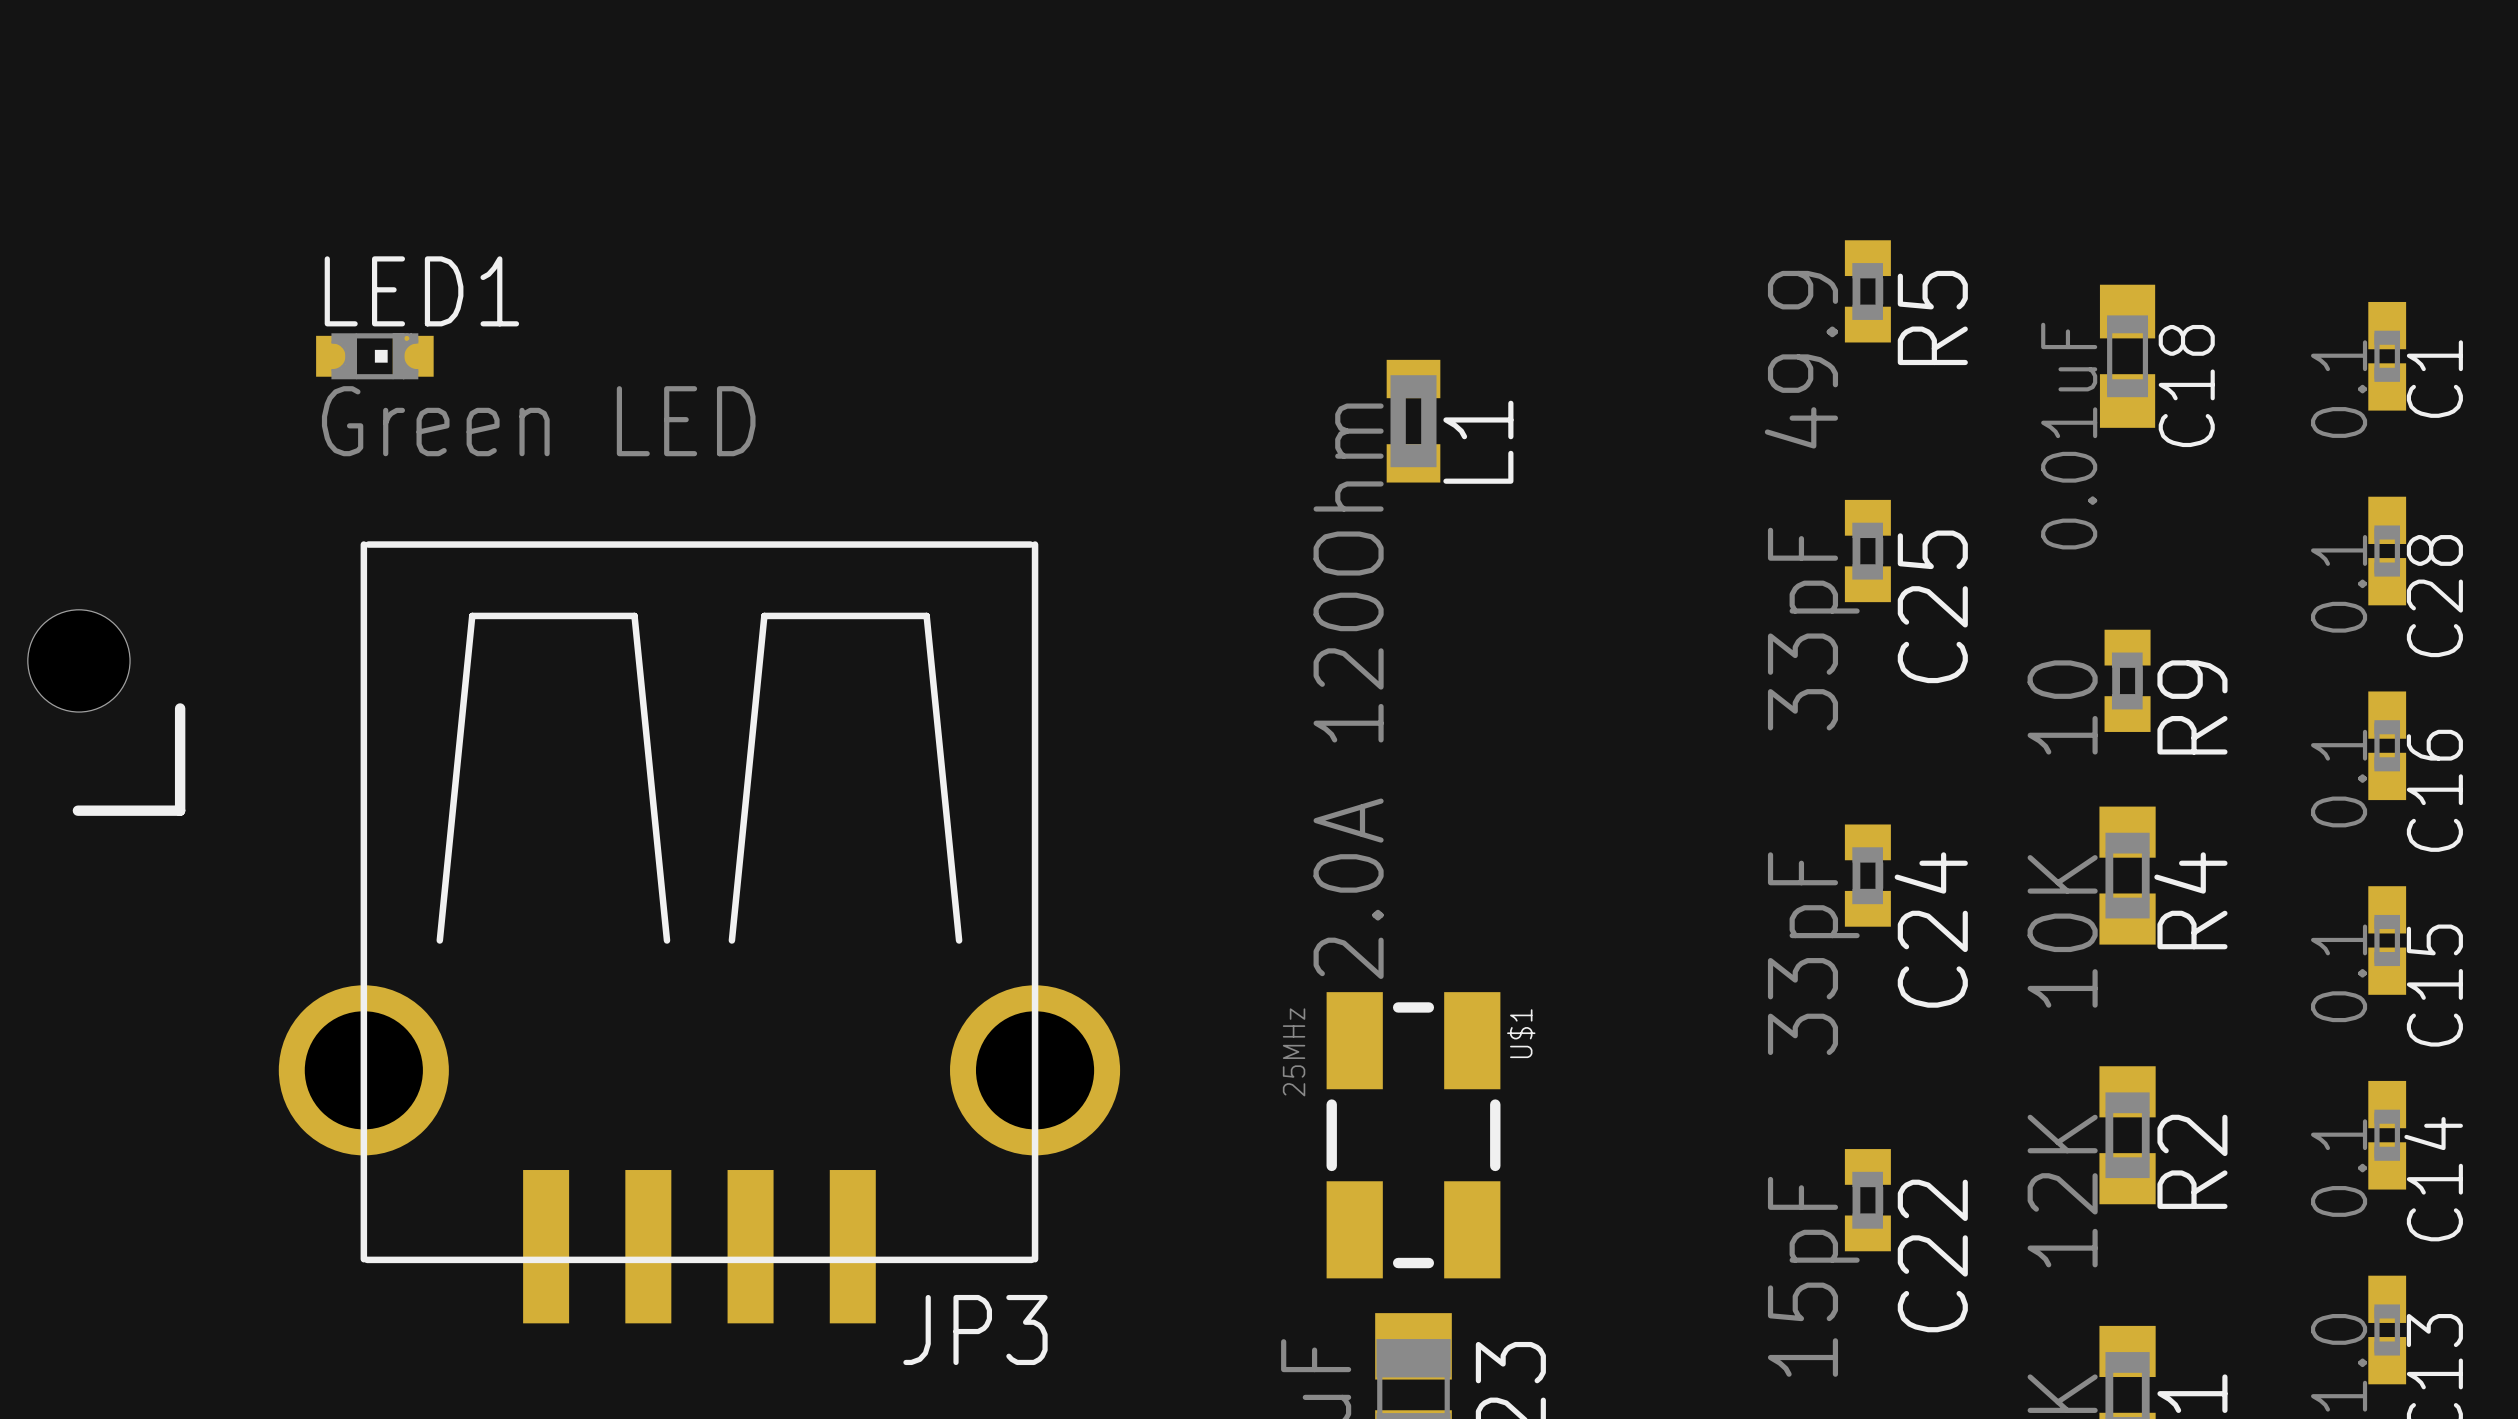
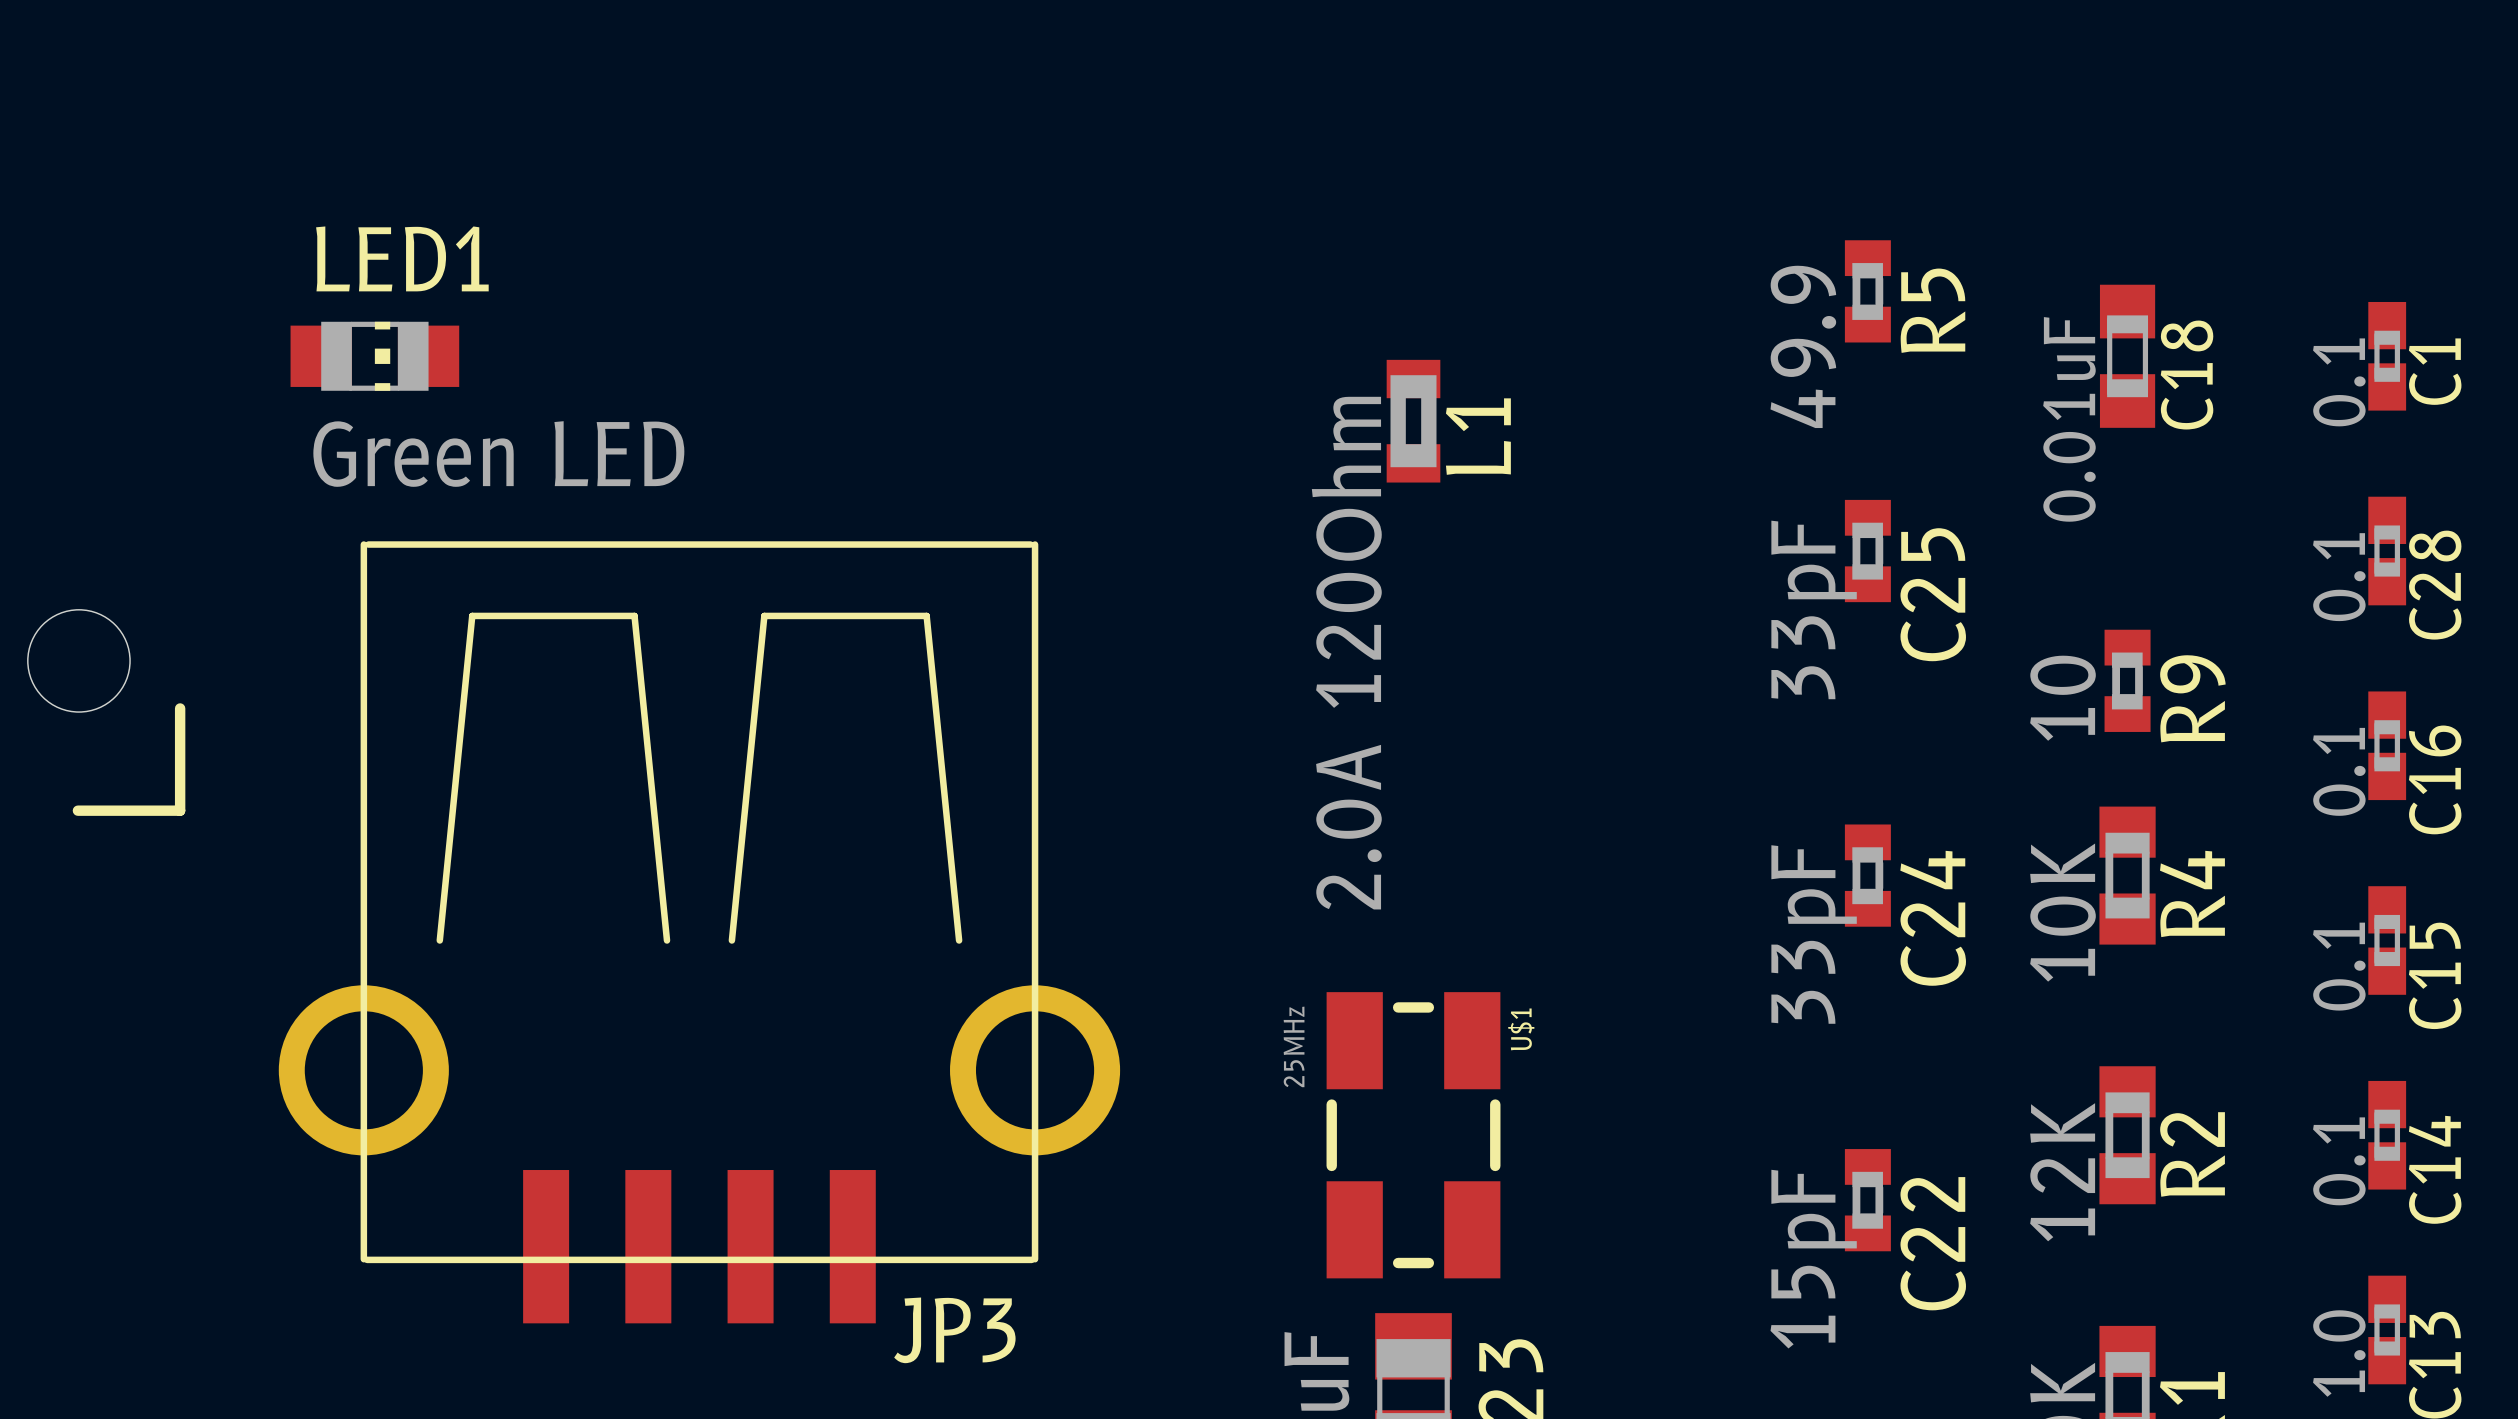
LED1 name position: LED1 (421, 291) -> LED1 (402, 258)
LED1 footprint: [316, 333, 434, 380] -> [290, 321, 460, 391]
LED1 value position: Green LED (538, 421) -> Green LED (498, 454)

